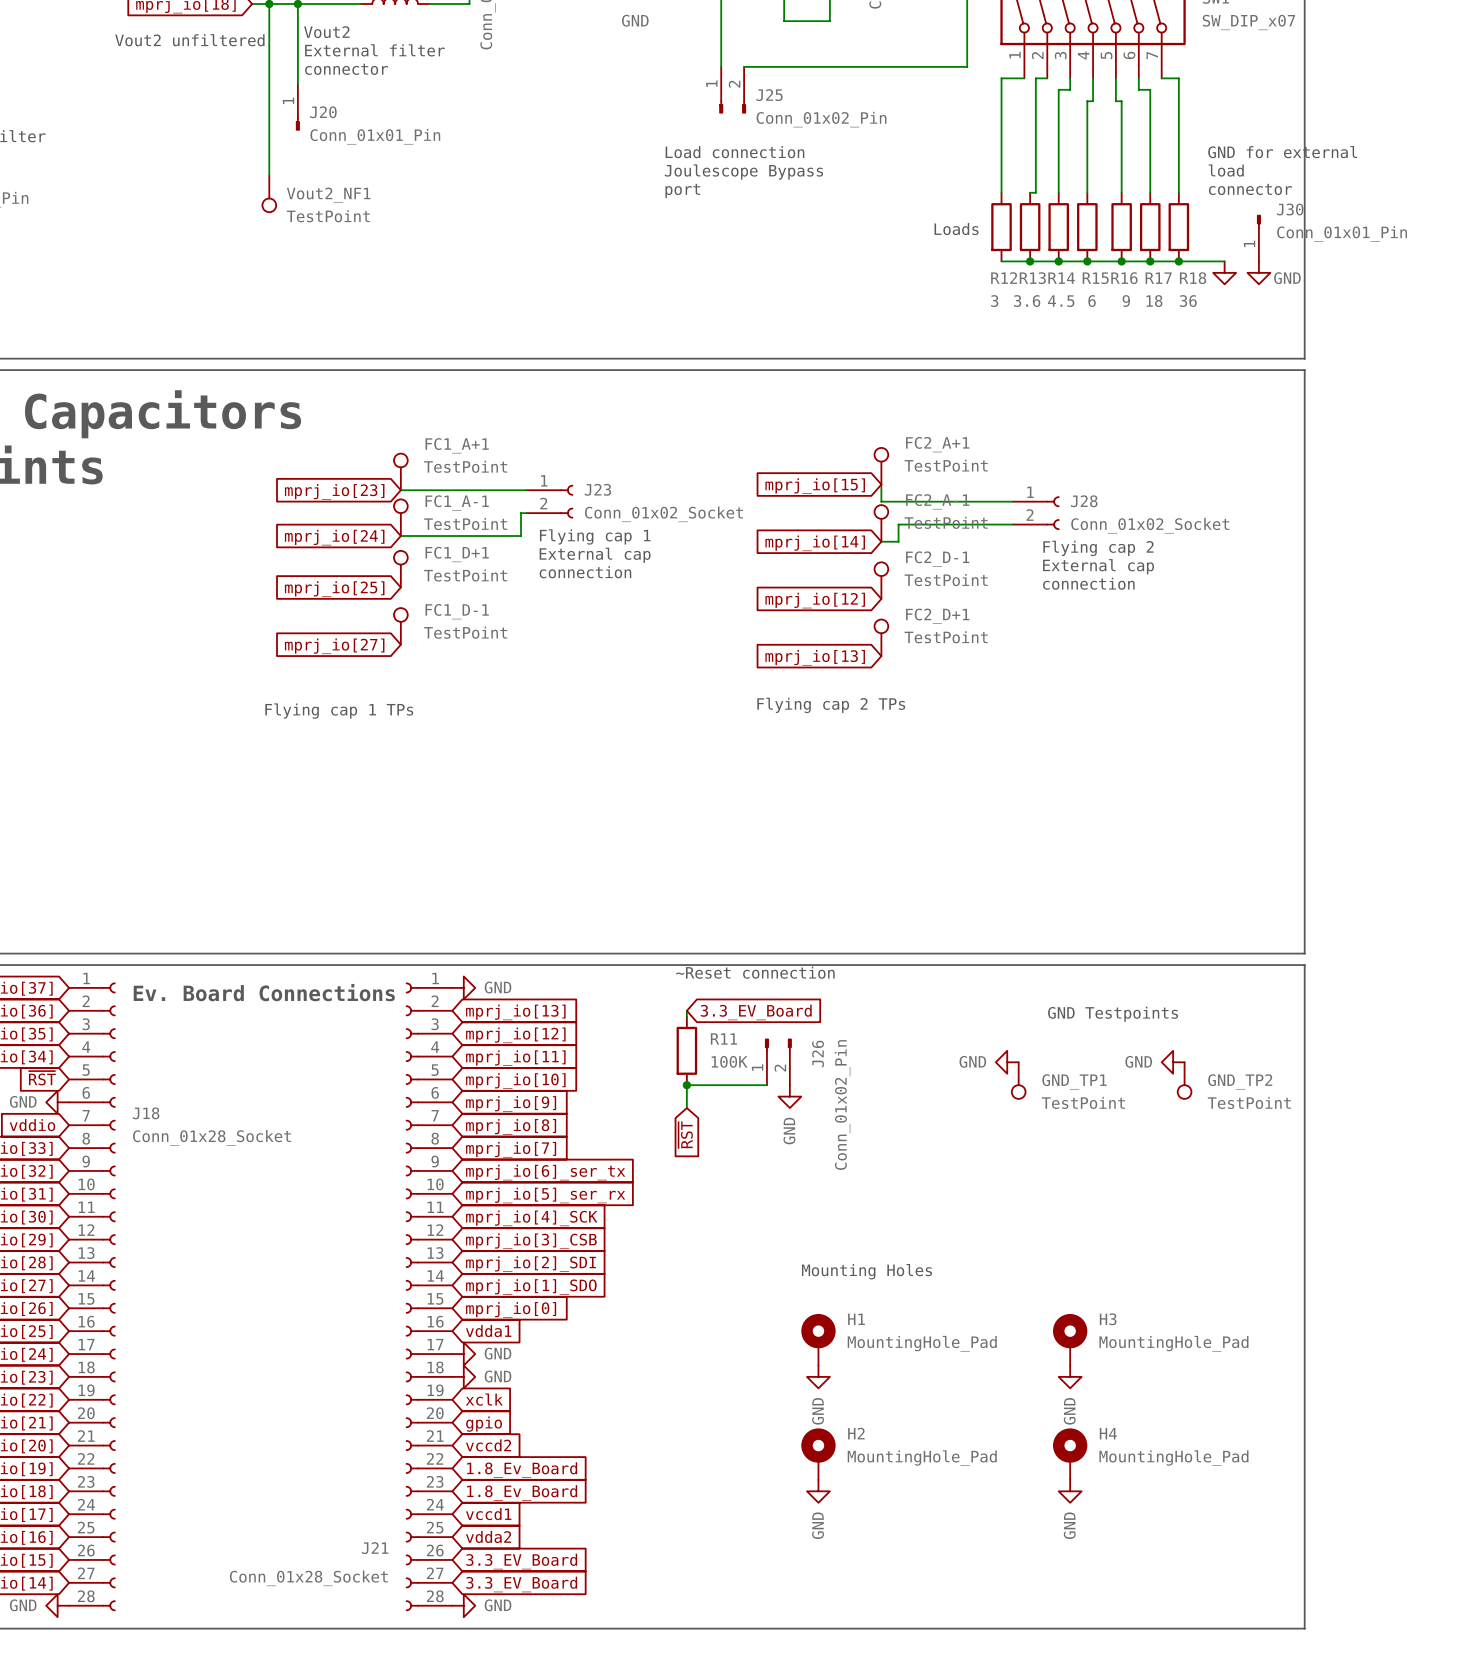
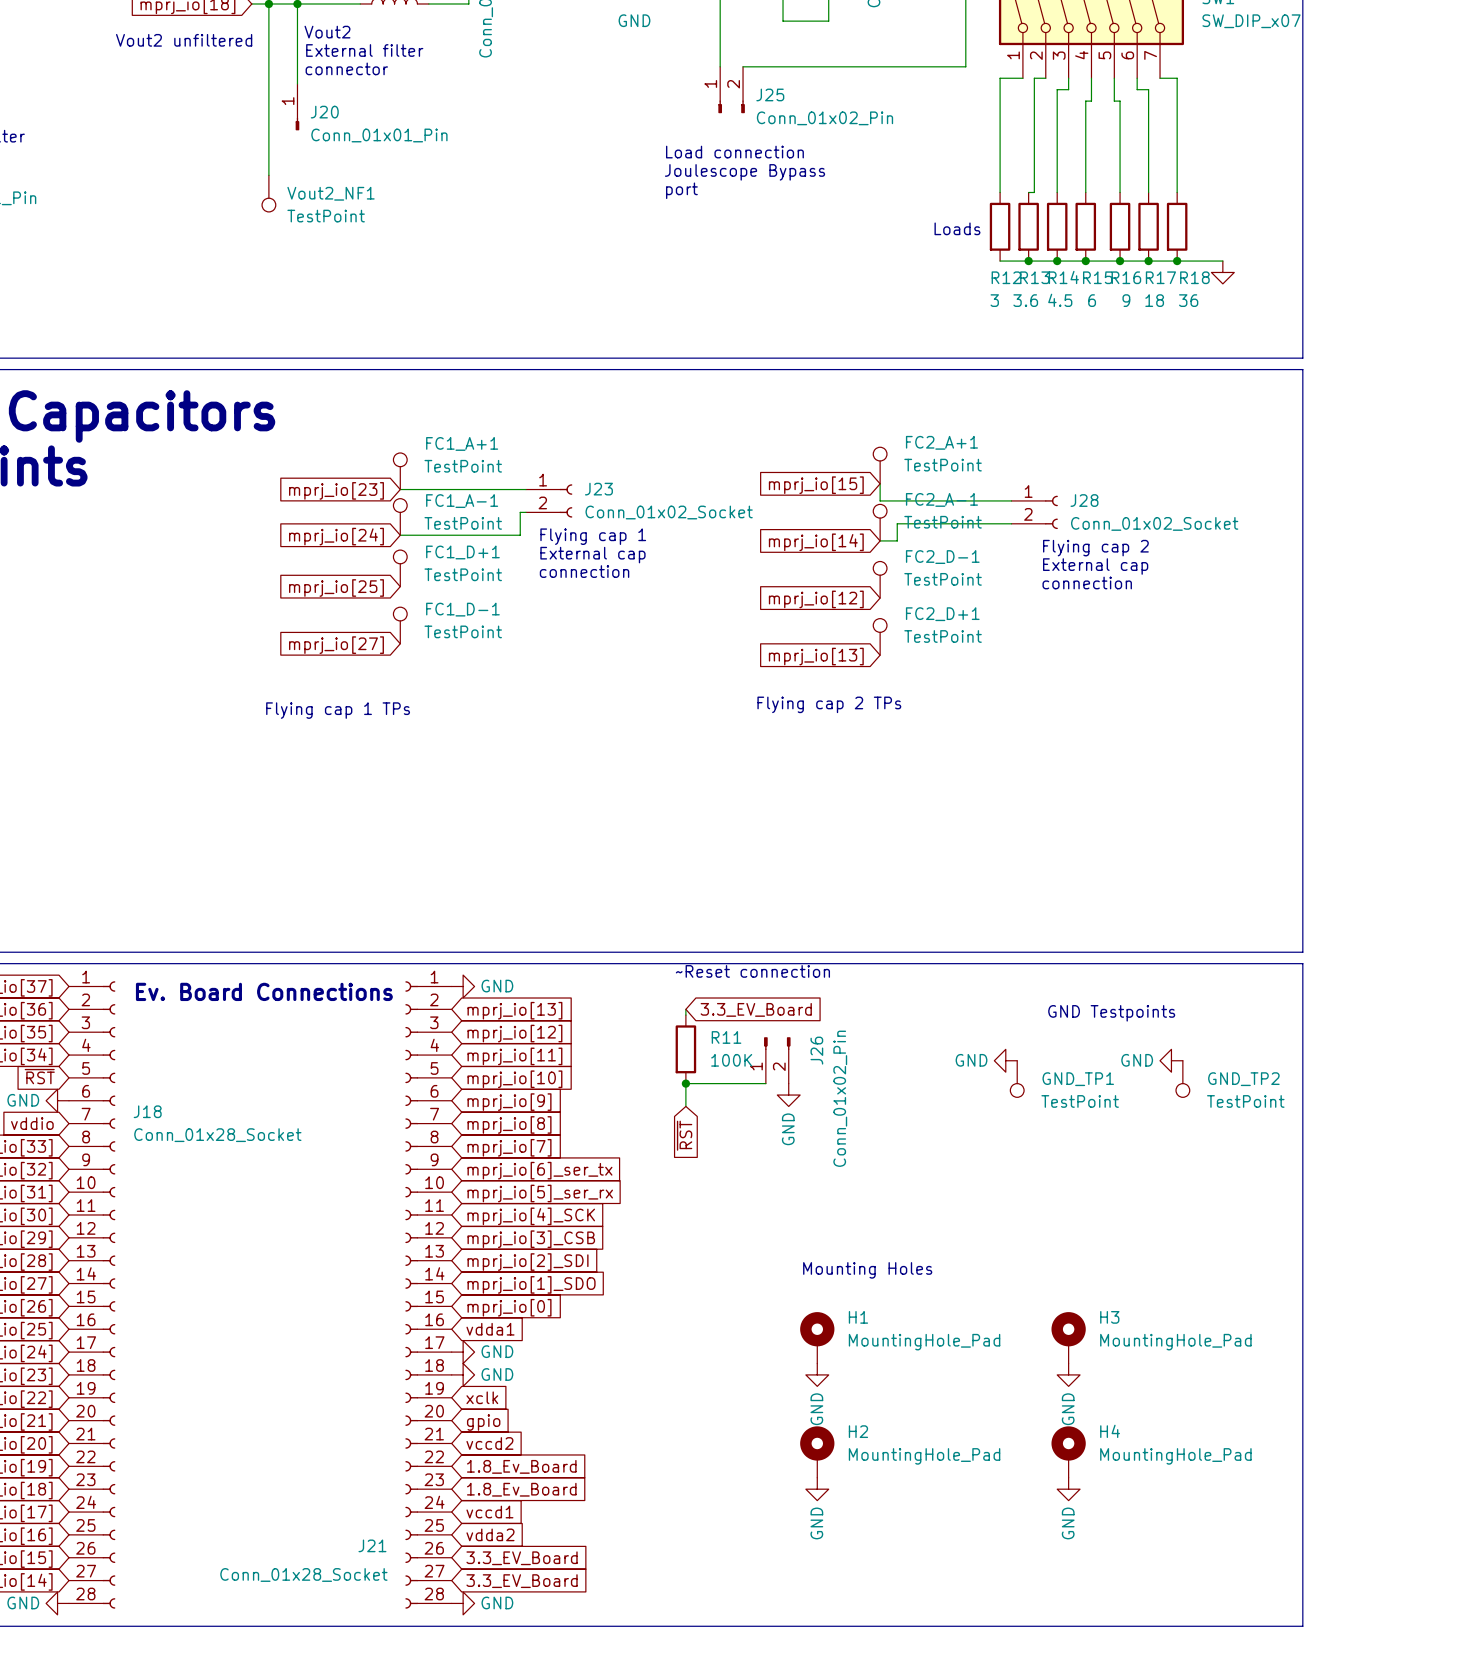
text: GND for external (1282, 152) -> none
text: load (1226, 170) -> none
text: connector (1250, 189) -> none
J30: Conn_01x01_Pin (1258, 238) -> none
power symbol: GND (1258, 272) -> none

